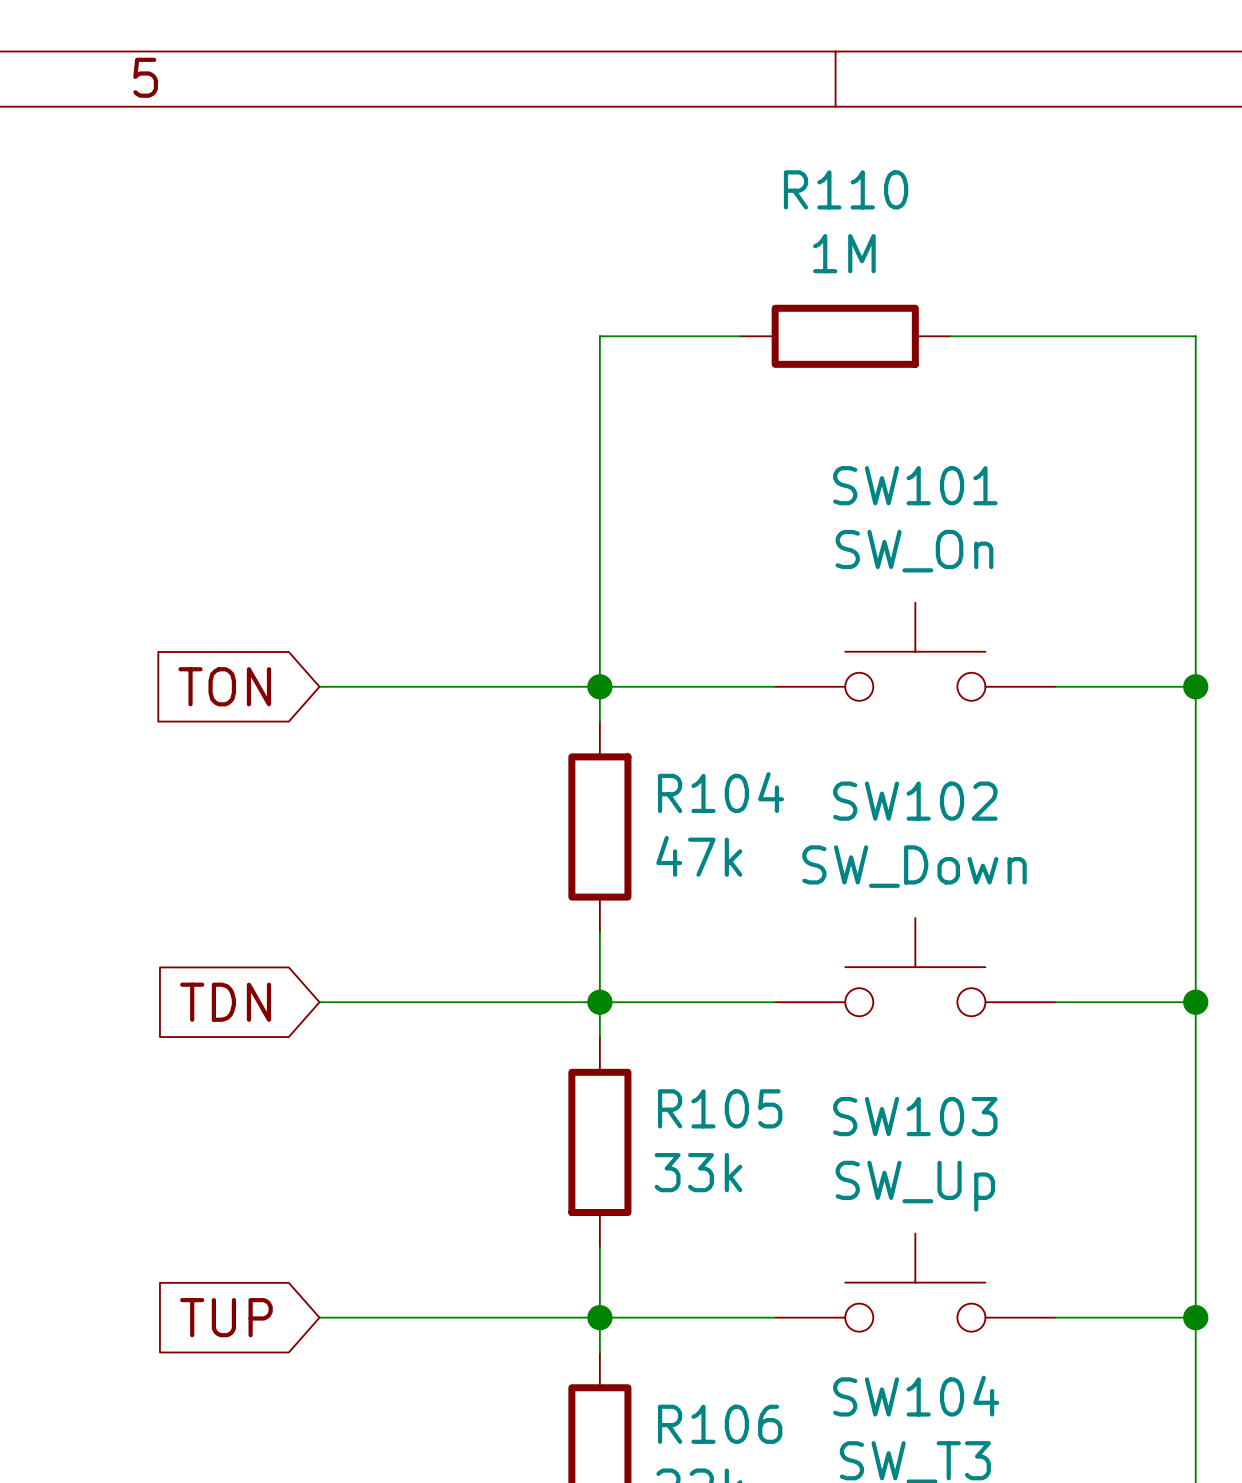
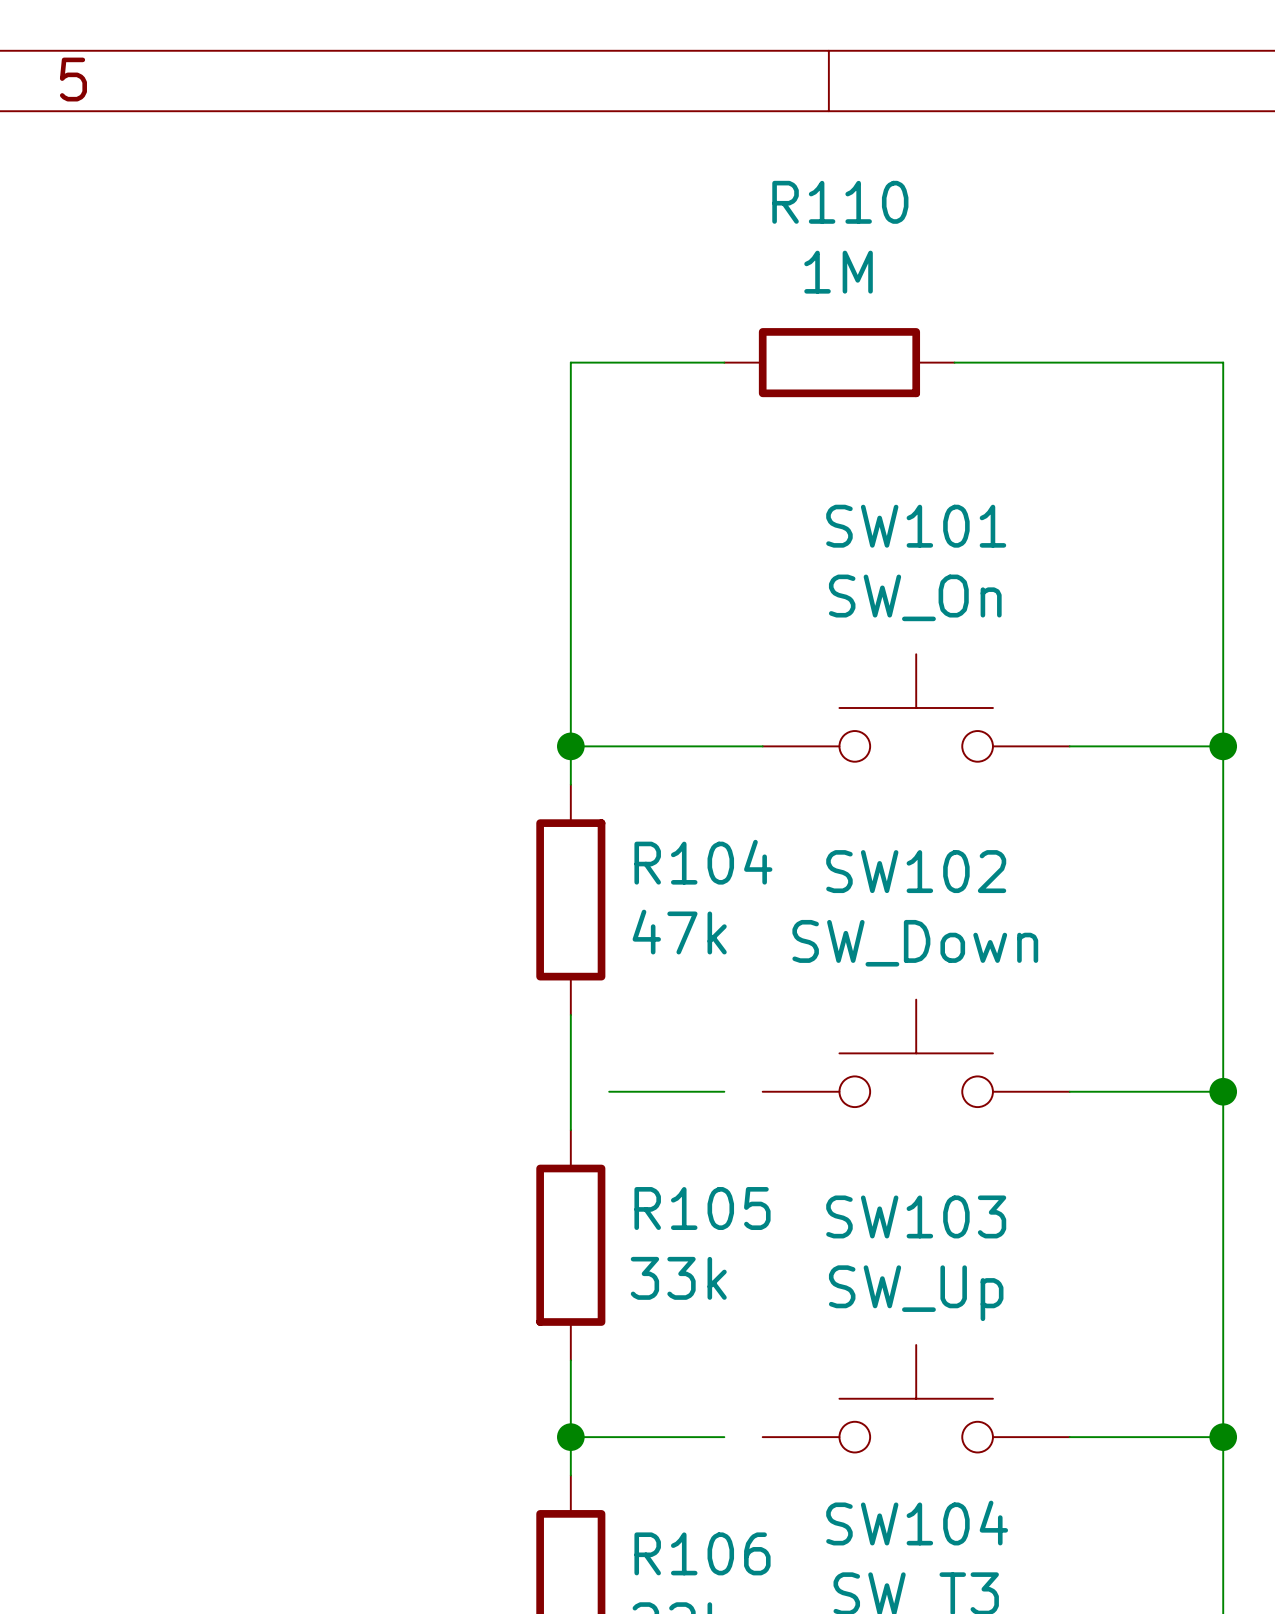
global label: TON (224, 686) -> none
wire: (319, 686) (599, 686) -> none
global label: TDN (225, 1002) -> none
wire: (319, 1002) (634, 1002) -> none
junction: (599, 1002) -> none
wire: (740, 1002) (775, 1002) -> none
global label: TUP (226, 1317) -> none
wire: (319, 1317) (599, 1317) -> none
wire: (740, 1317) (775, 1317) -> none

